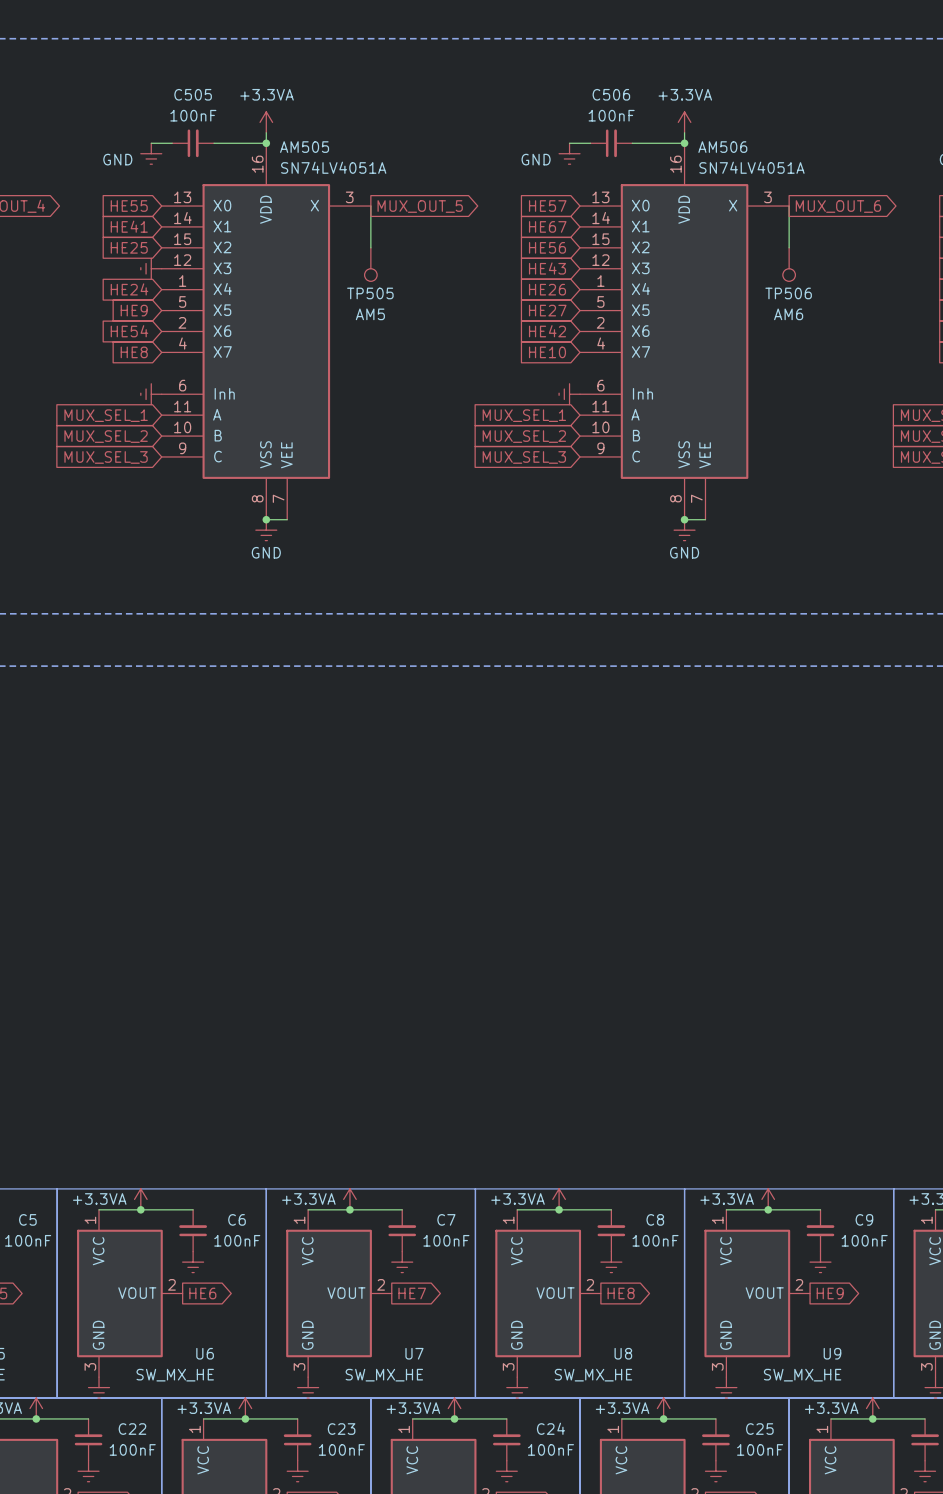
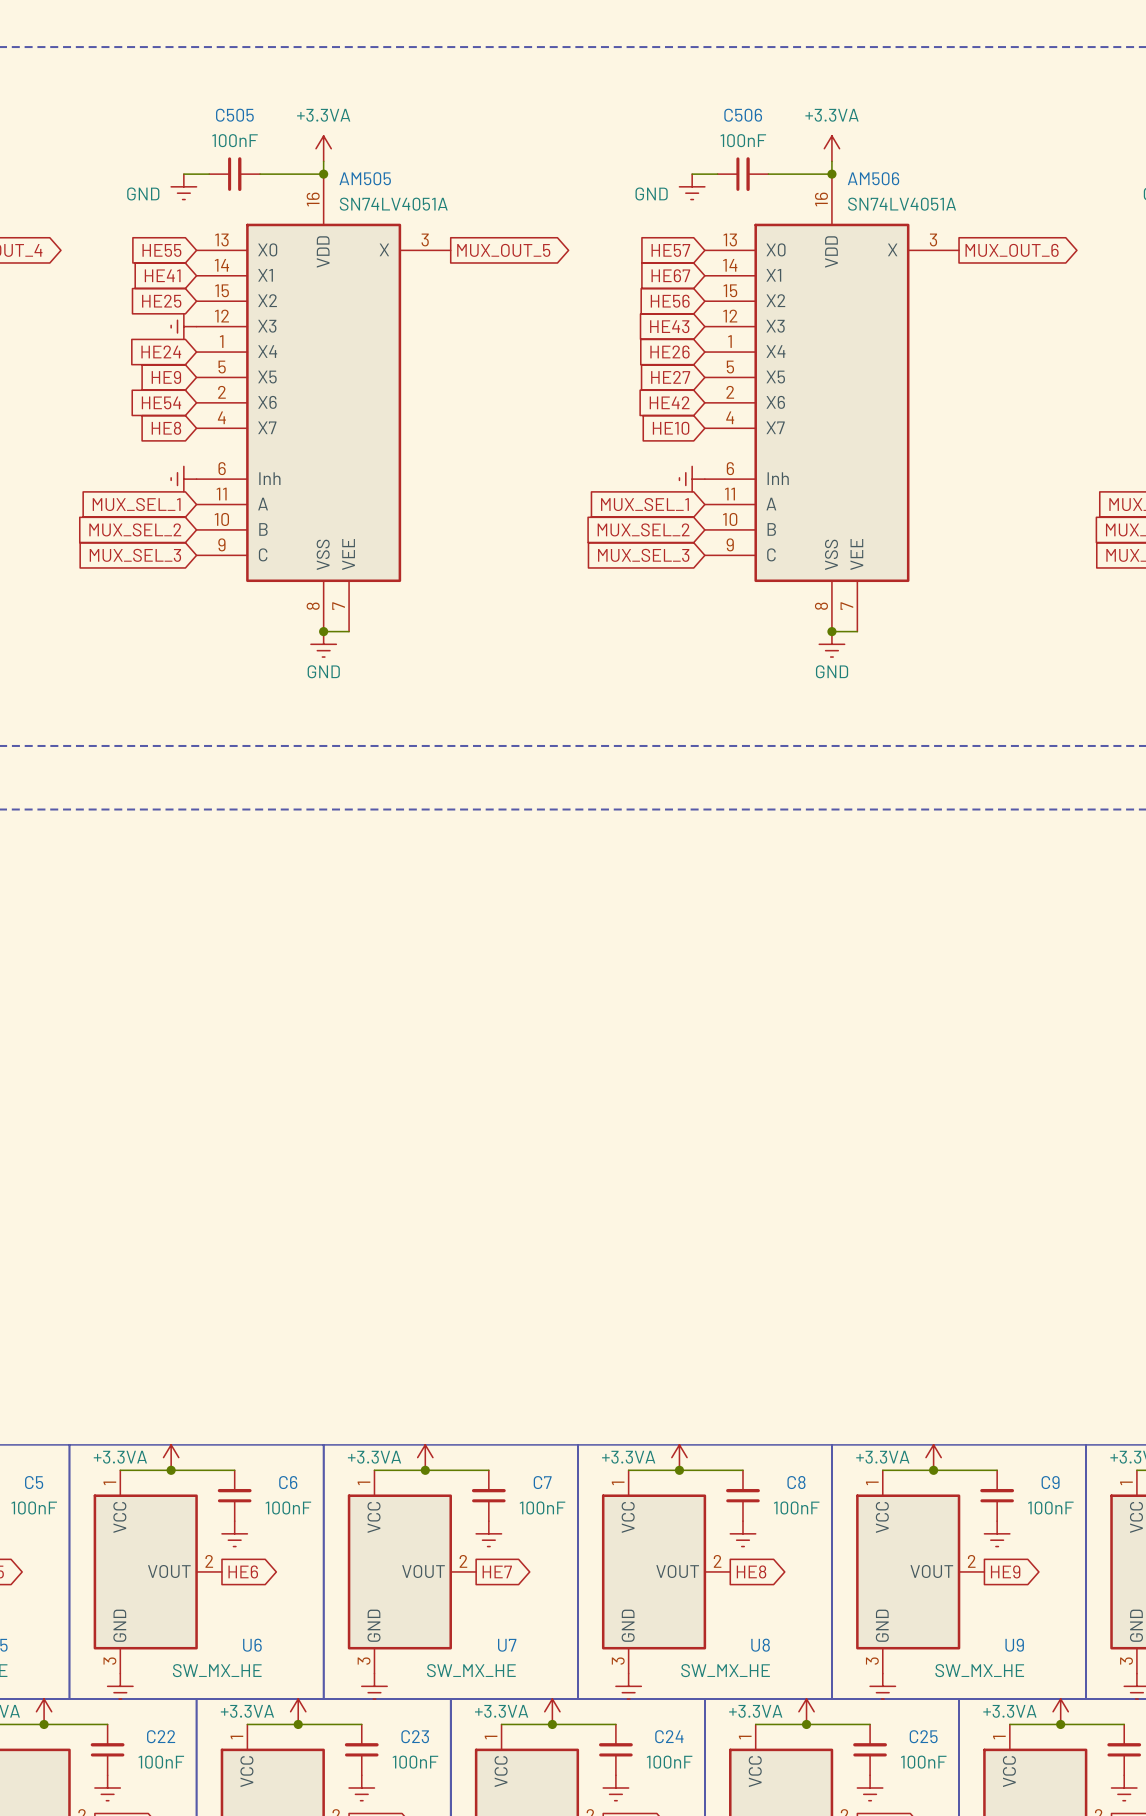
wire: (370, 206) (370, 247) -> none
wire: (789, 206) (789, 247) -> none
TP505: AM5 (370, 264) -> none
TP506: AM6 (789, 264) -> none

